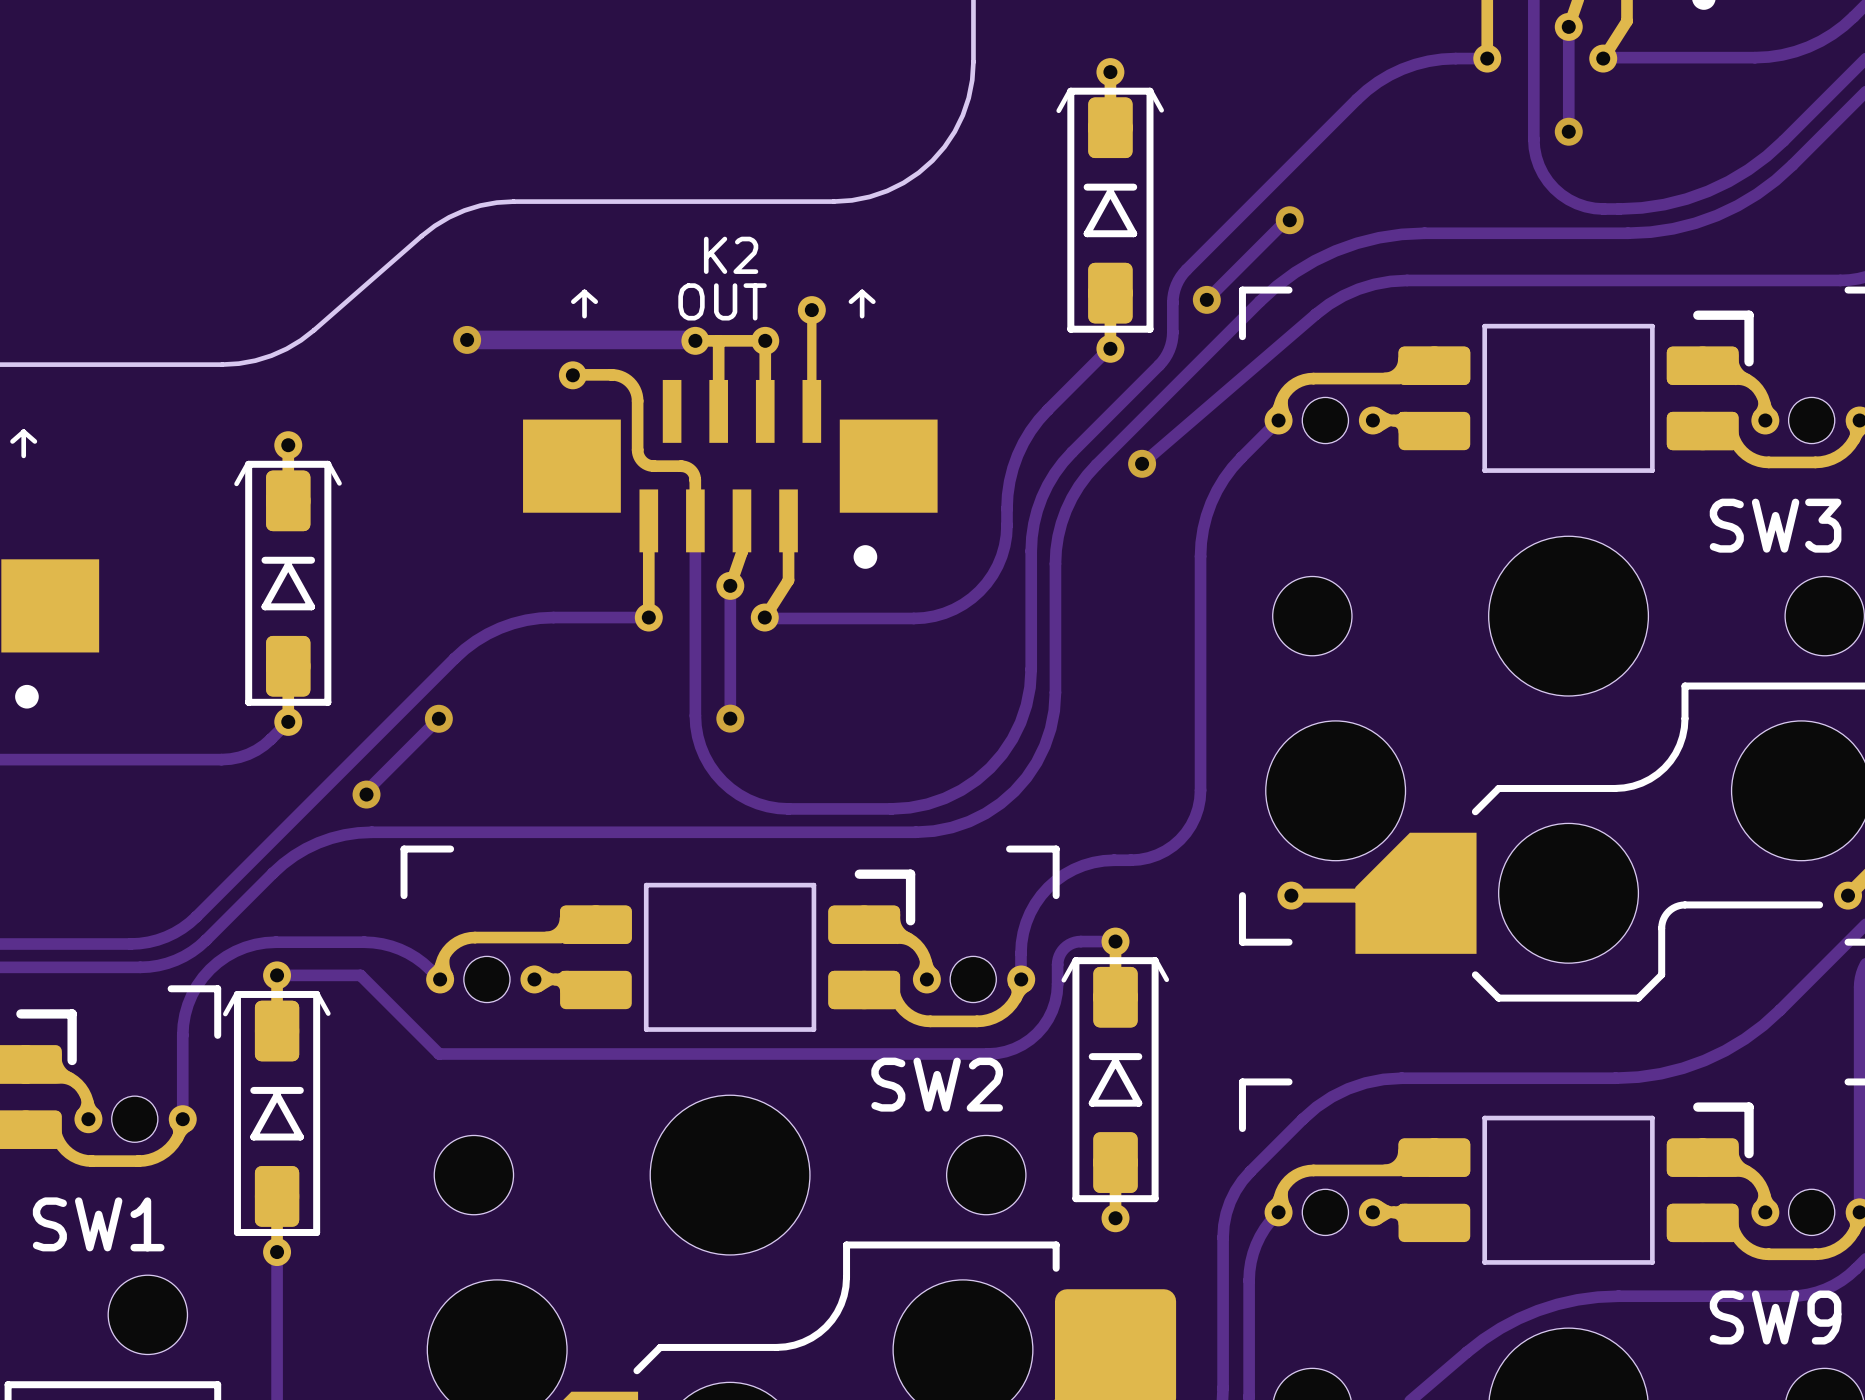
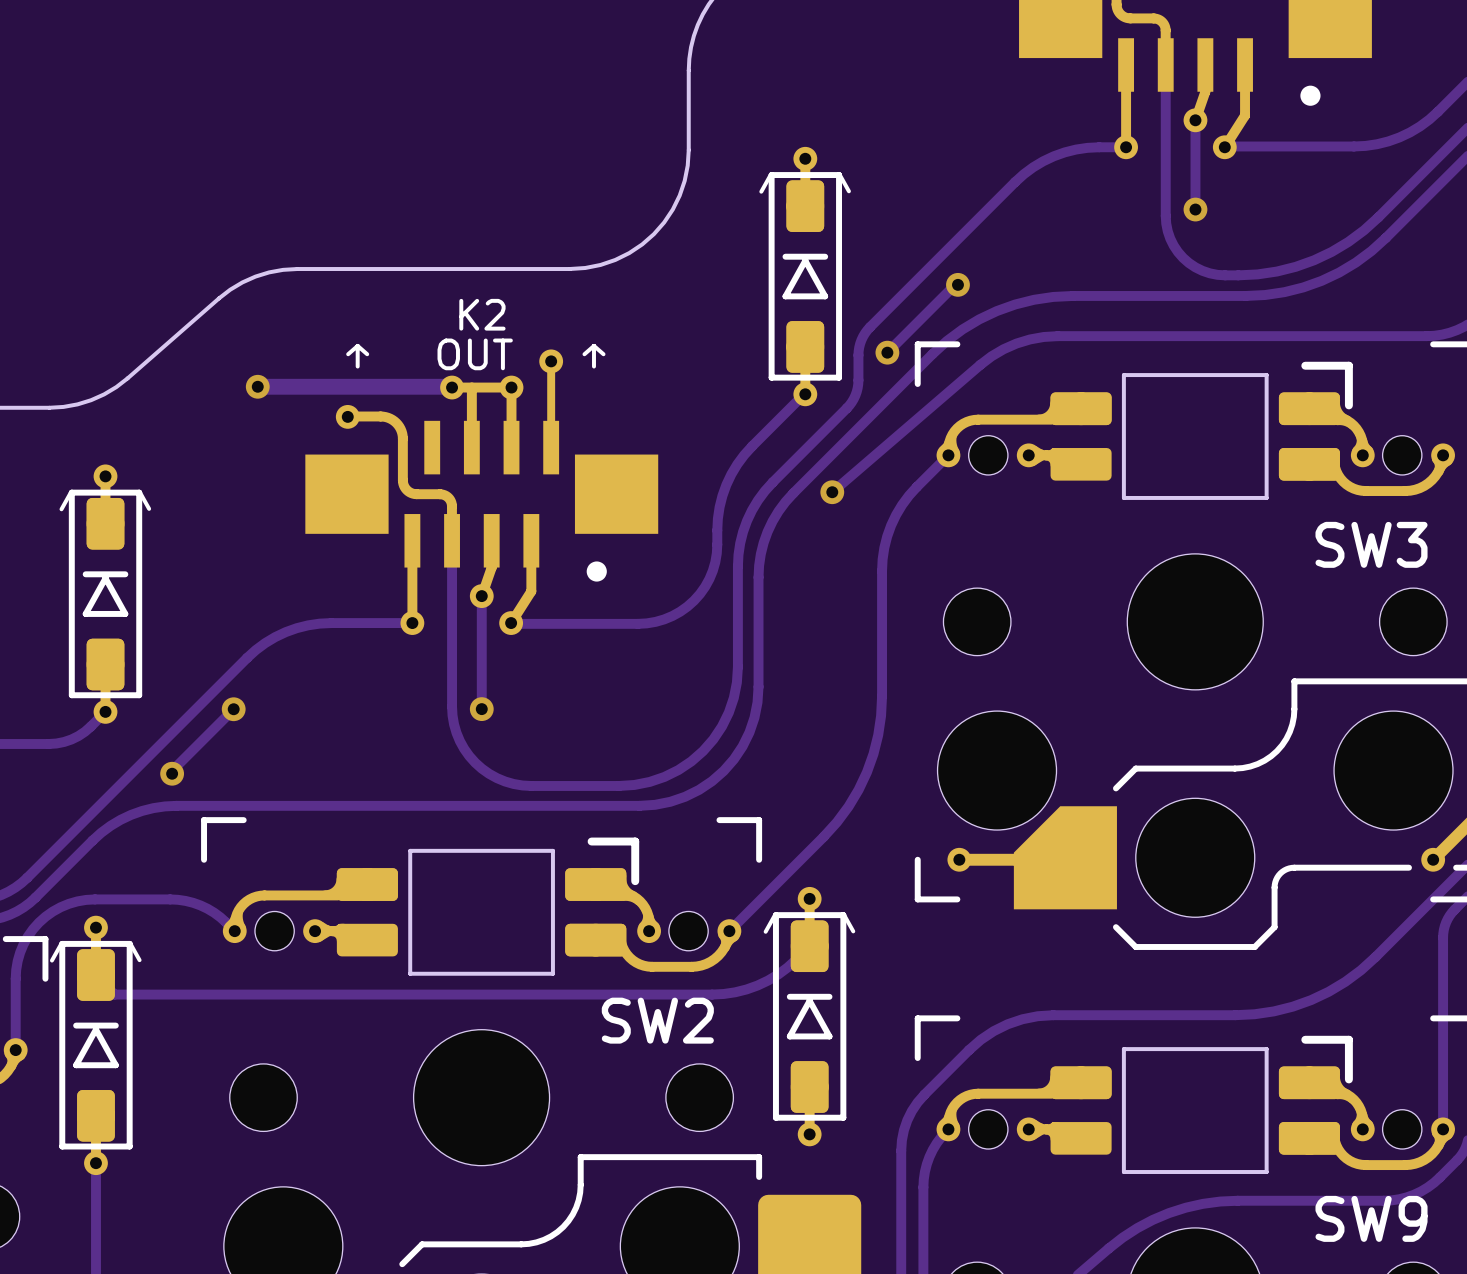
track: (1200, 703) (1199, 799) (1191, 825) (1180, 839) (1157, 854) (1139, 859) (1103, 860) (1083, 865) (1064, 874) (1048, 887) (1035, 903) (1026, 922) (1021, 942) (1020, 979) -> (882, 696) (878, 735) (873, 753) (866, 772) (848, 806) (823, 836) (729, 931)
track: (1115, 941) (1077, 941) (1064, 948) (1057, 961) (1055, 1002) (1043, 1026) (1022, 1044) (1005, 1051) (987, 1053) -> (796, 959) (778, 974) (757, 985) (735, 992) (700, 994)
track: (277, 975) (360, 975) (439, 1053) -> (95, 976) (114, 994) (233, 994)

